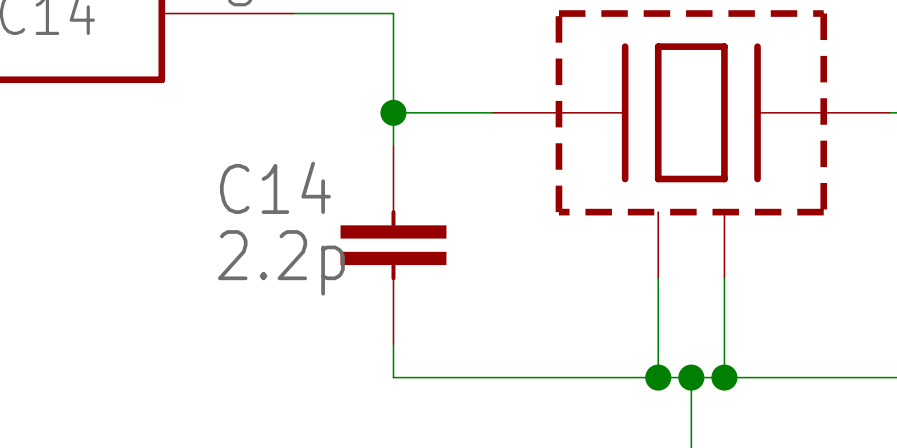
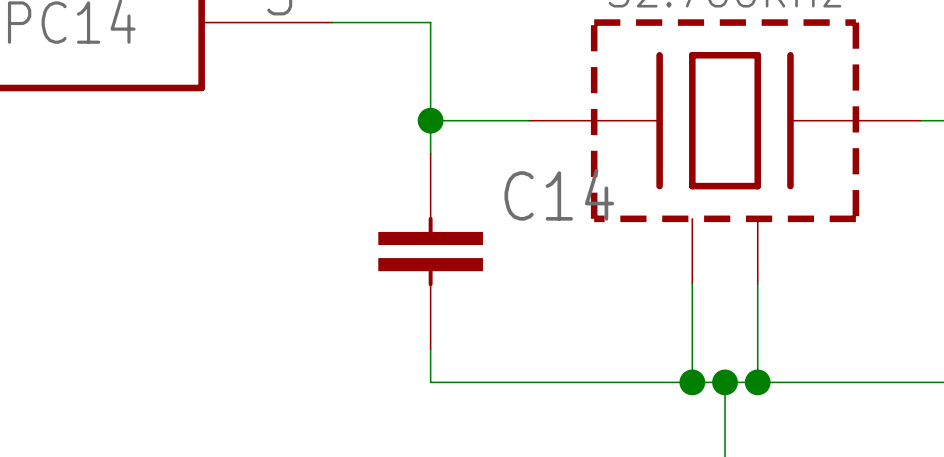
C14 name position: C14 (275, 187) -> C14 (559, 194)
C14 value: 2.2p (281, 262) -> none

